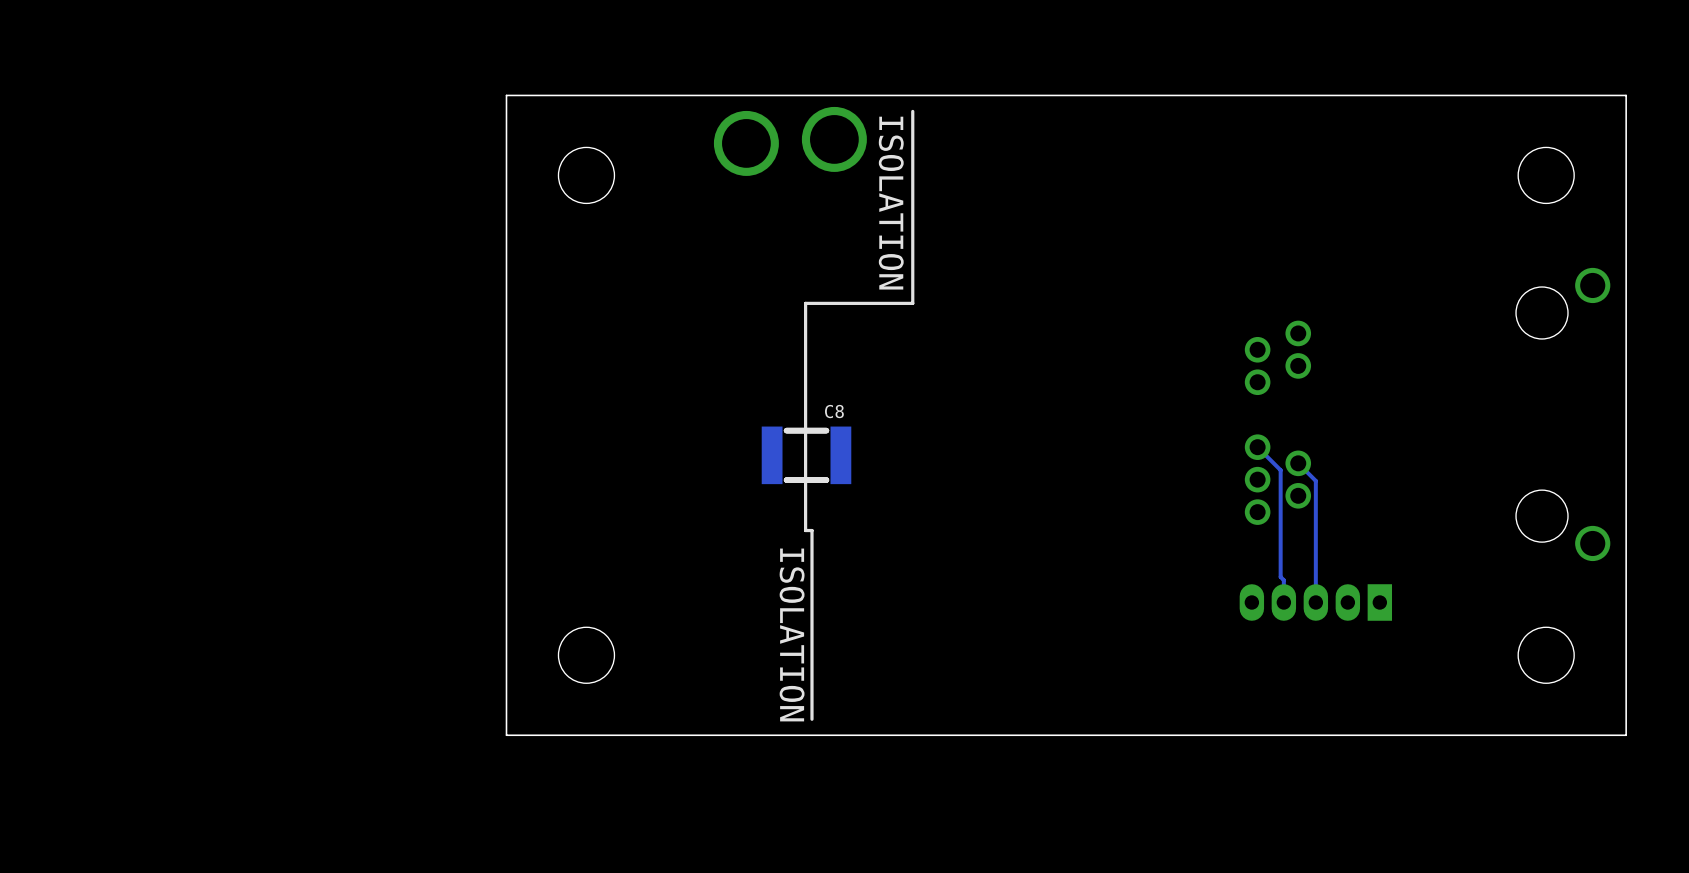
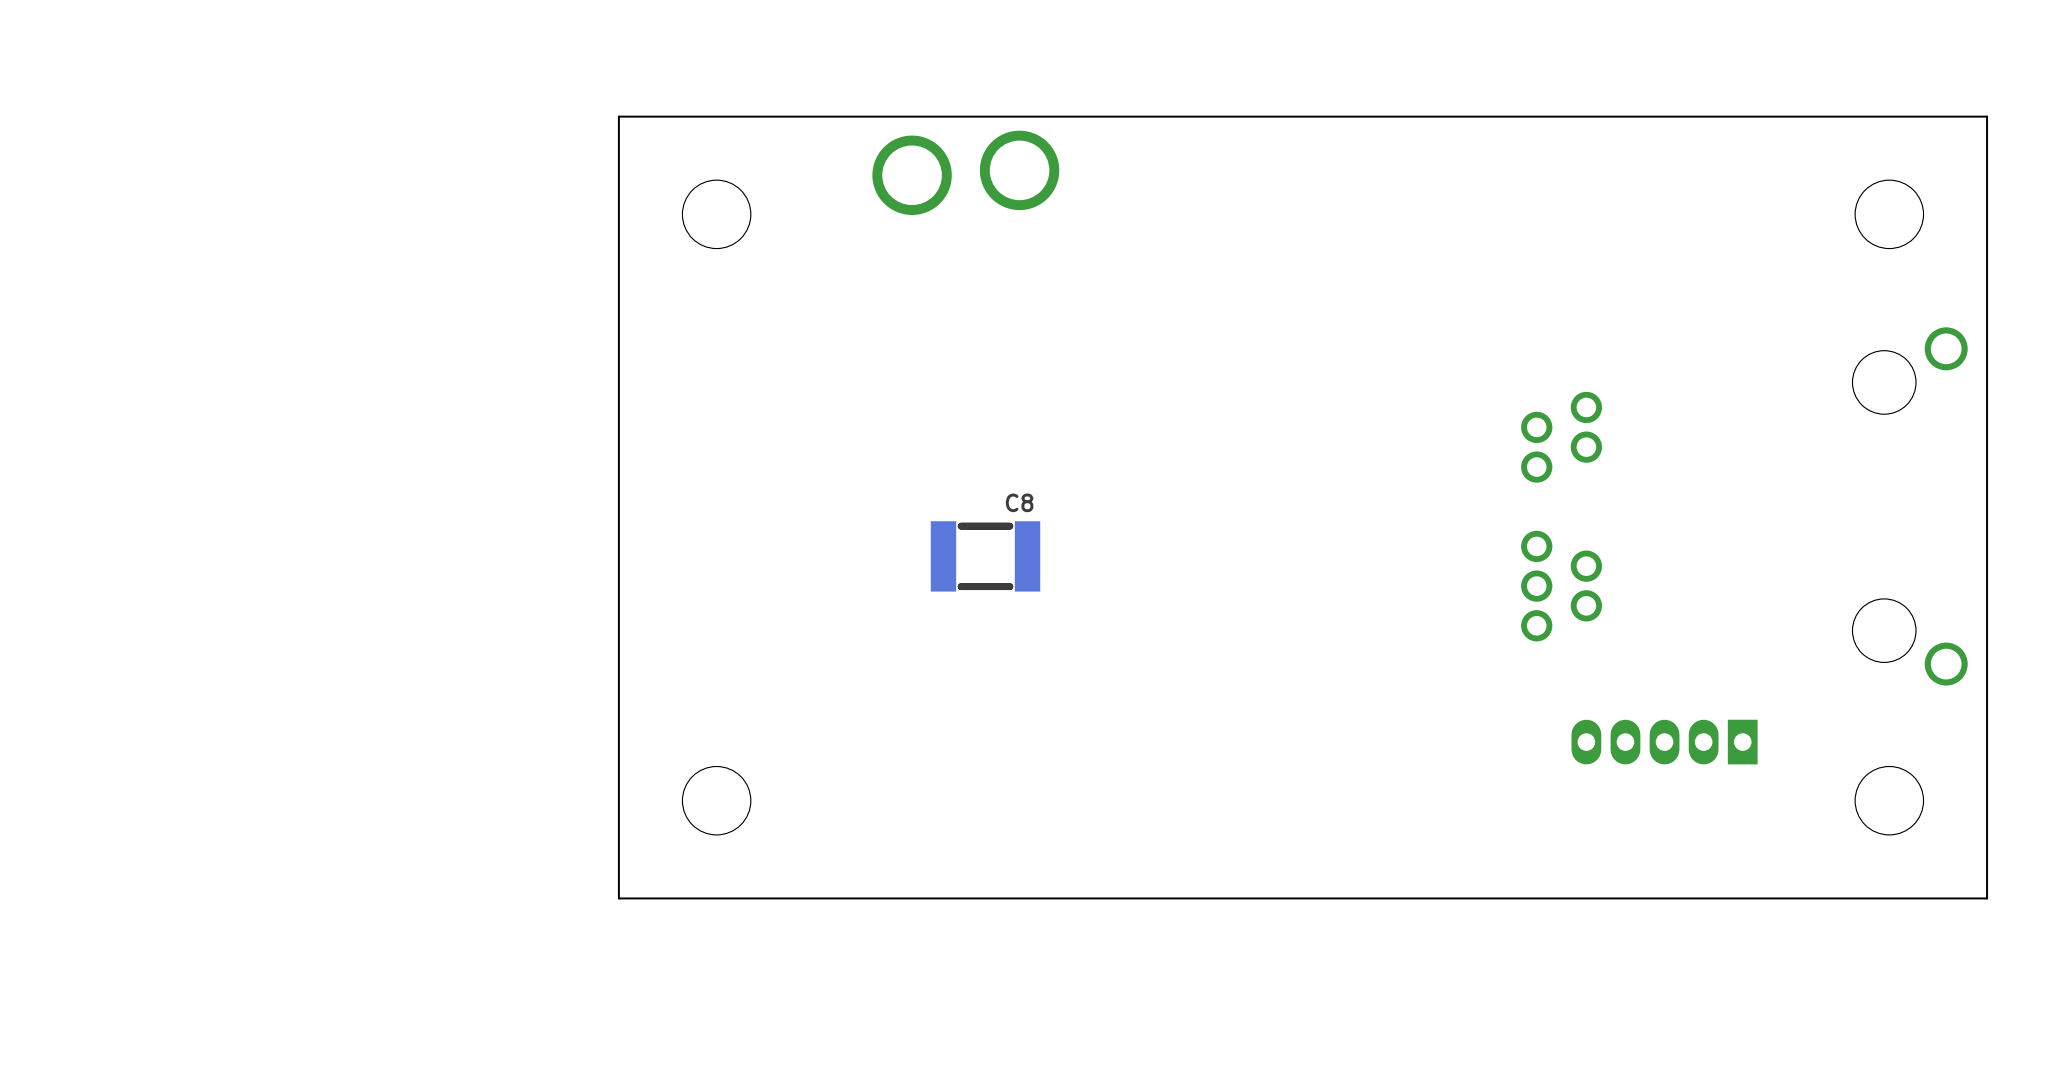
line: (912, 111) (912, 303) (805, 303) (805, 530) (811, 530) (811, 719) -> none
text: ISOLATION (891, 203) -> none
track: (1257, 447) (1280, 470) (1280, 577) (1283, 580) (1283, 602) -> none
track: (1298, 463) (1315, 480) (1315, 602) -> none
part position: (1315, 602) -> (1664, 742)
text: ISOLATION (792, 634) -> none

